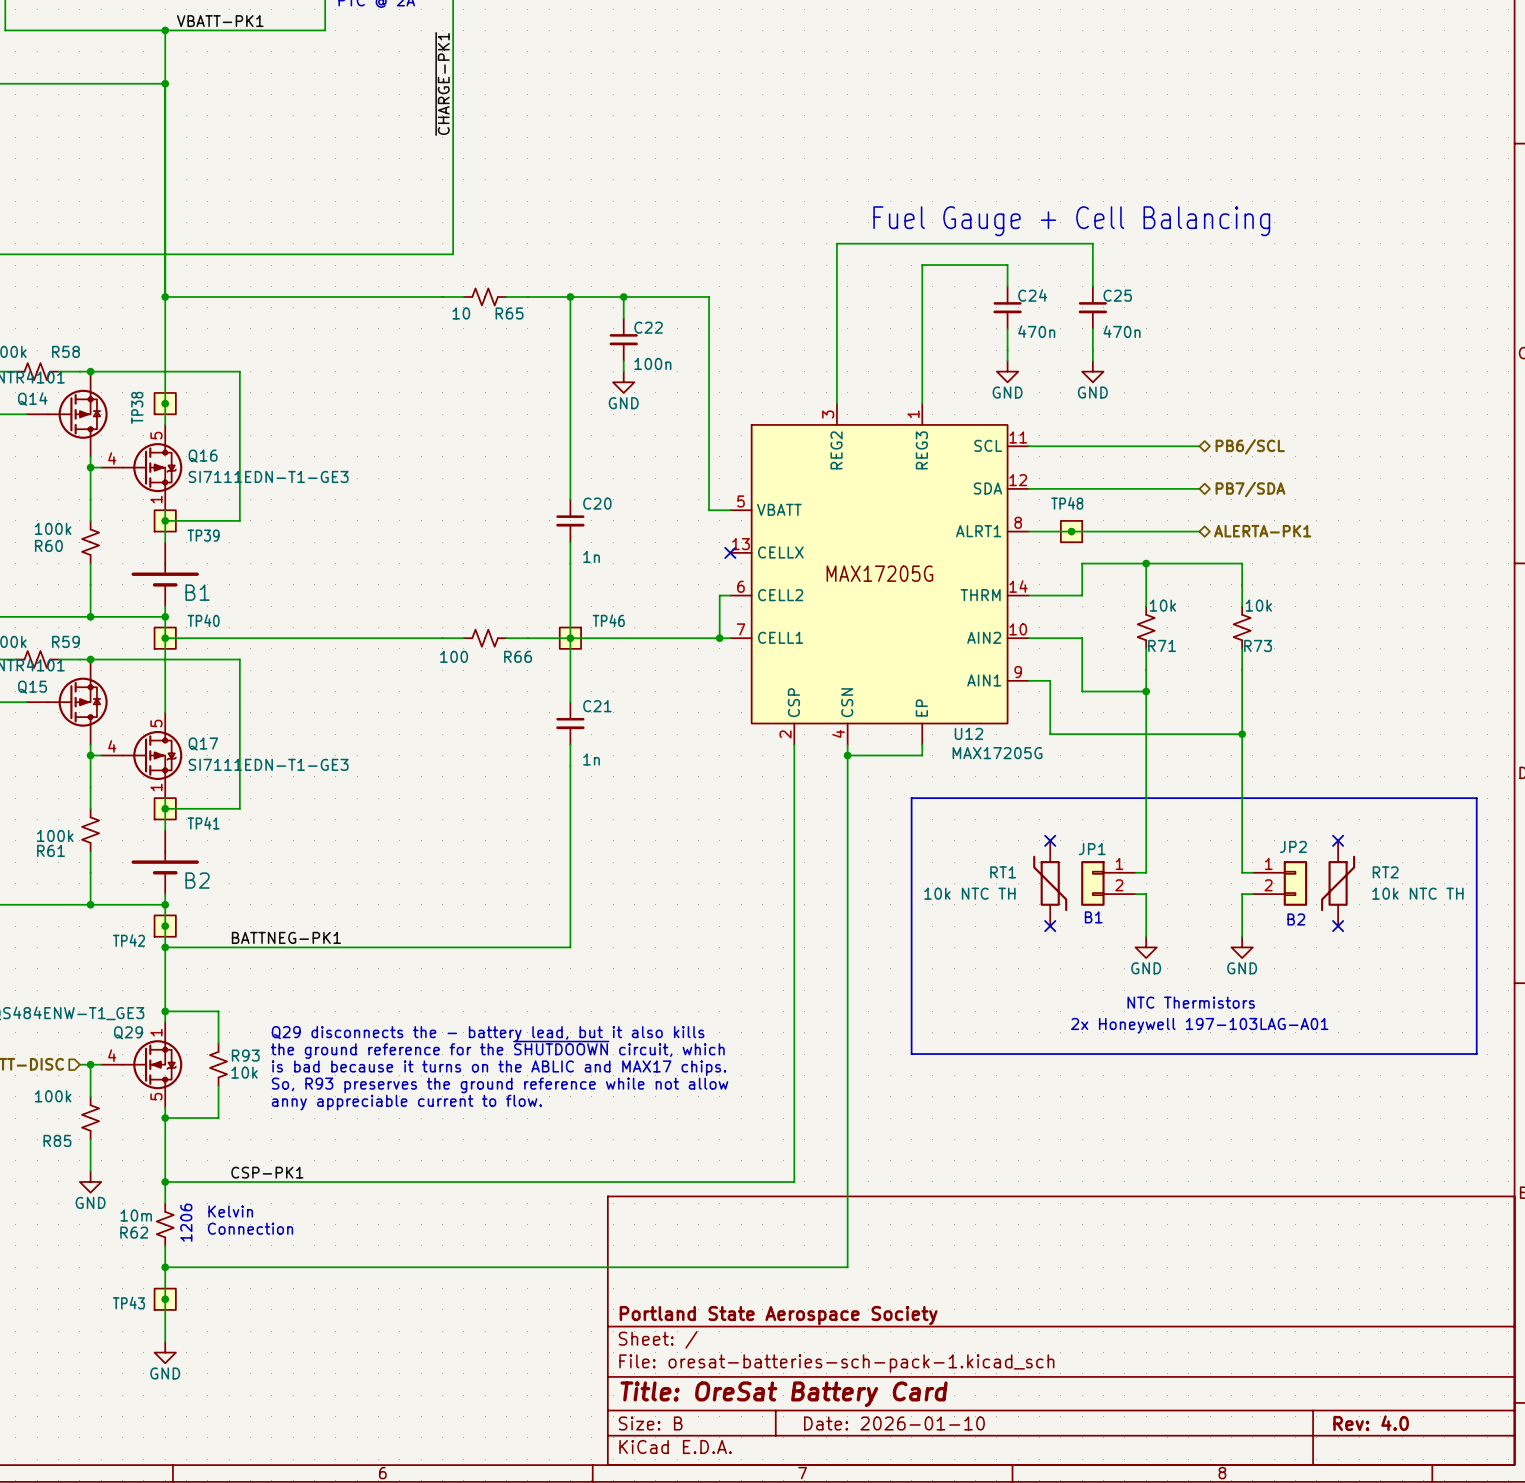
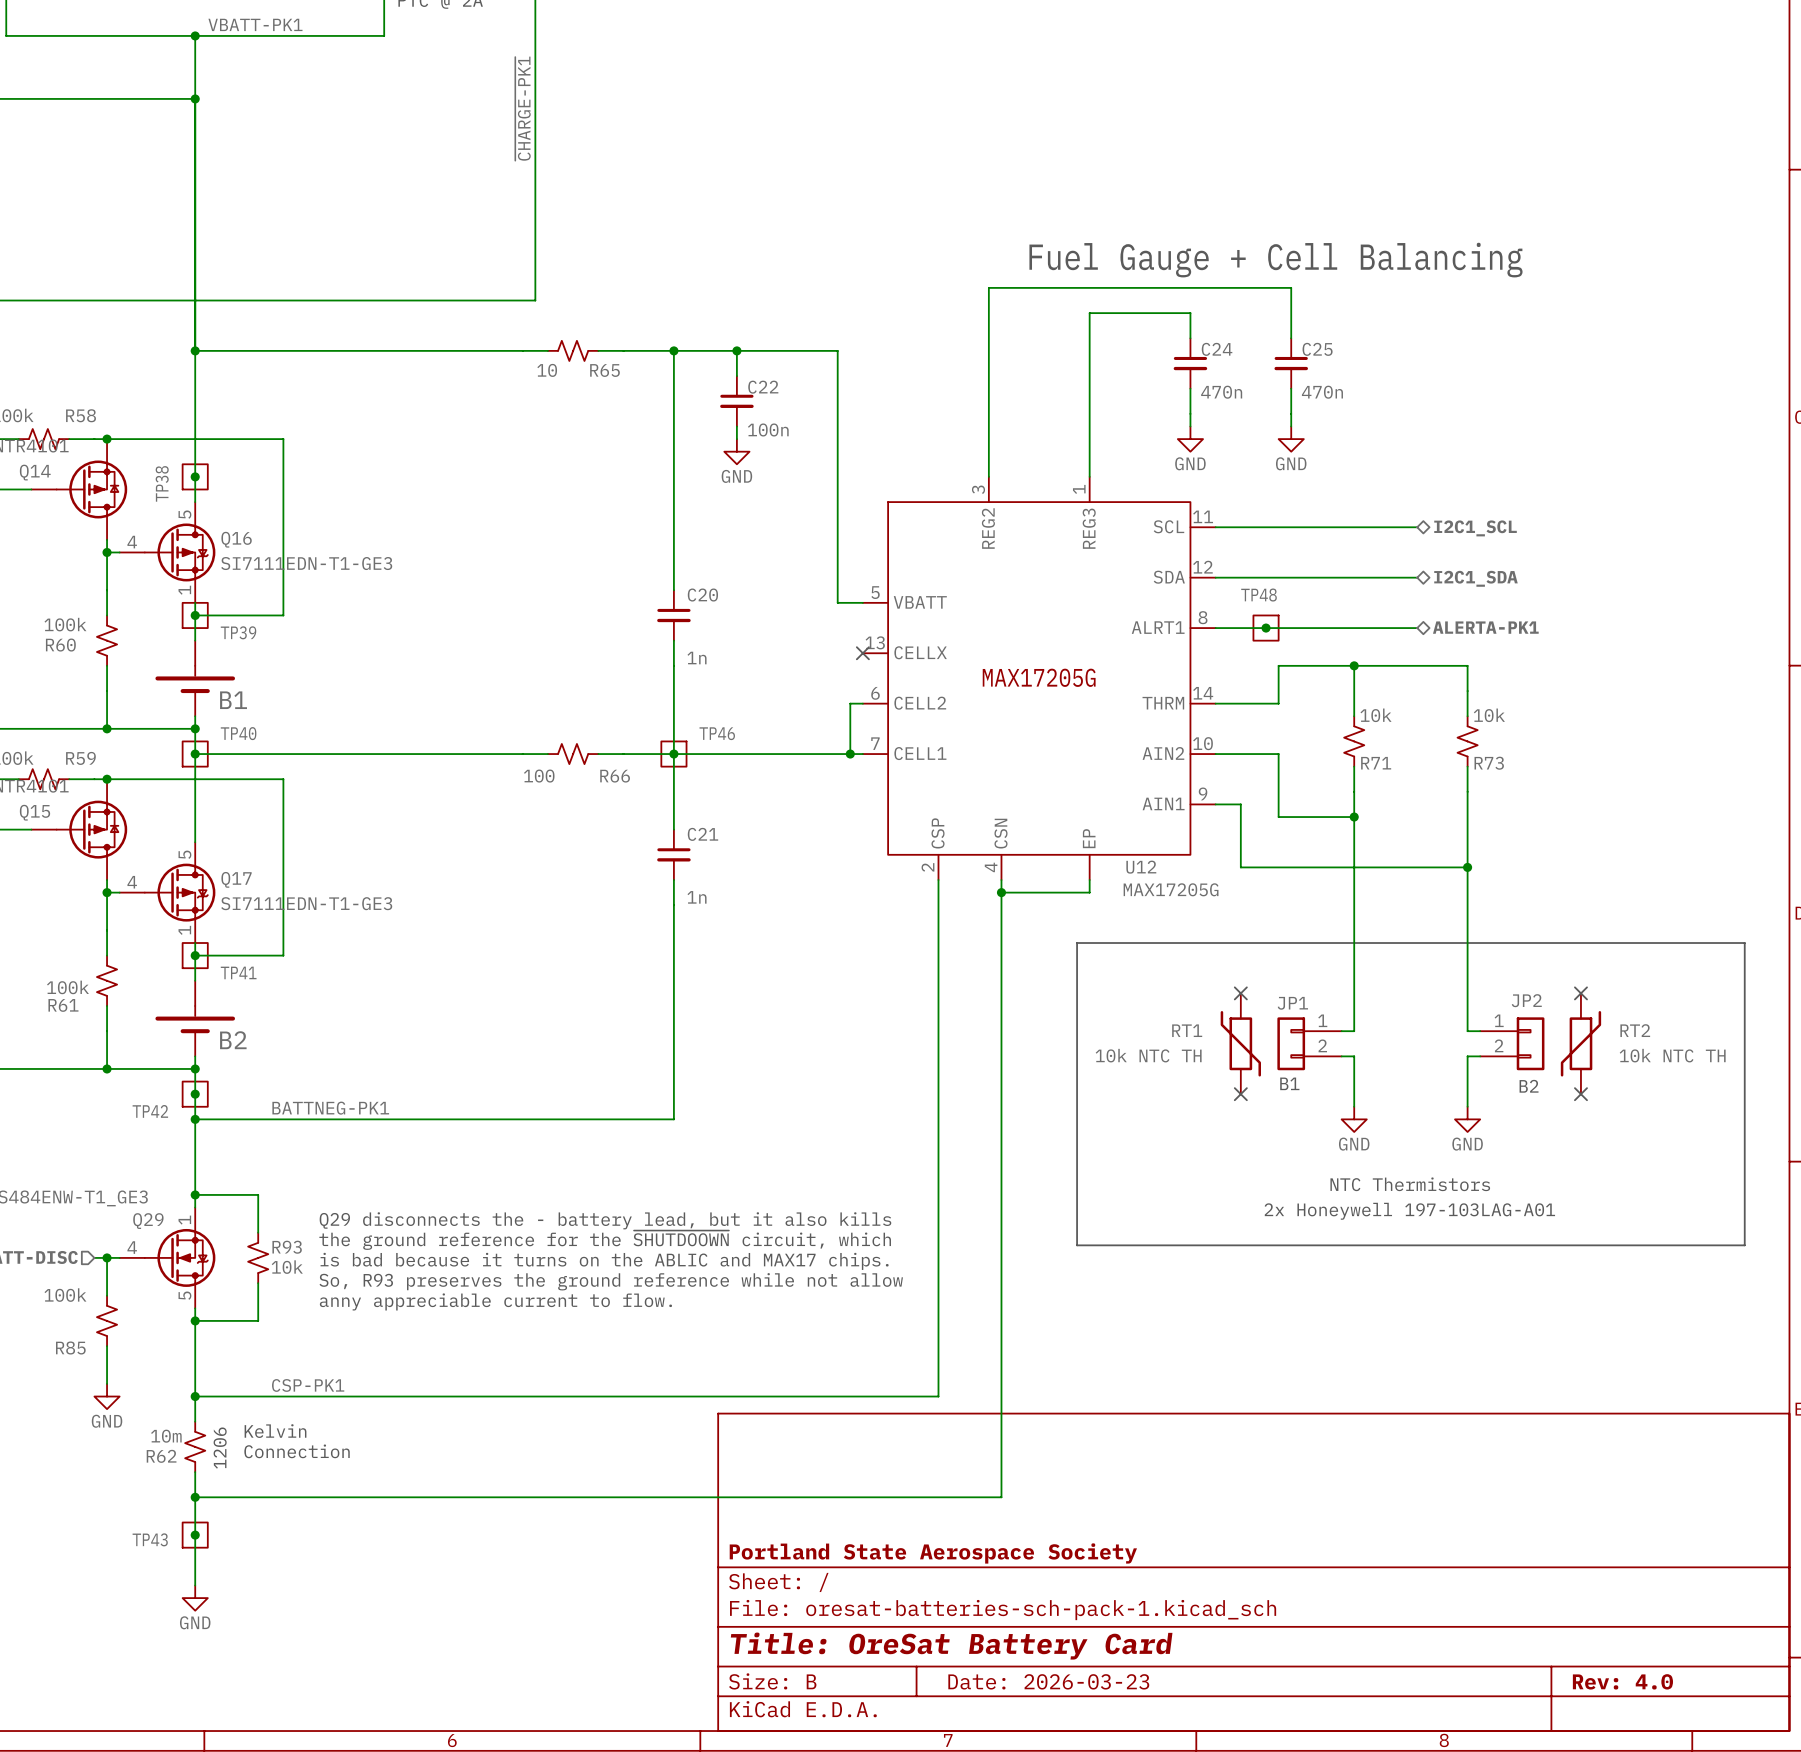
hierarchical label: PB6/SCL (1250, 446) -> I2C1_SCL (1475, 528)
hierarchical label: PB7/SDA (1250, 489) -> I2C1_SDA (1475, 578)
title block: Date: 2026-01-10 (894, 1423) -> Date: 2026-03-23 (1048, 1681)

